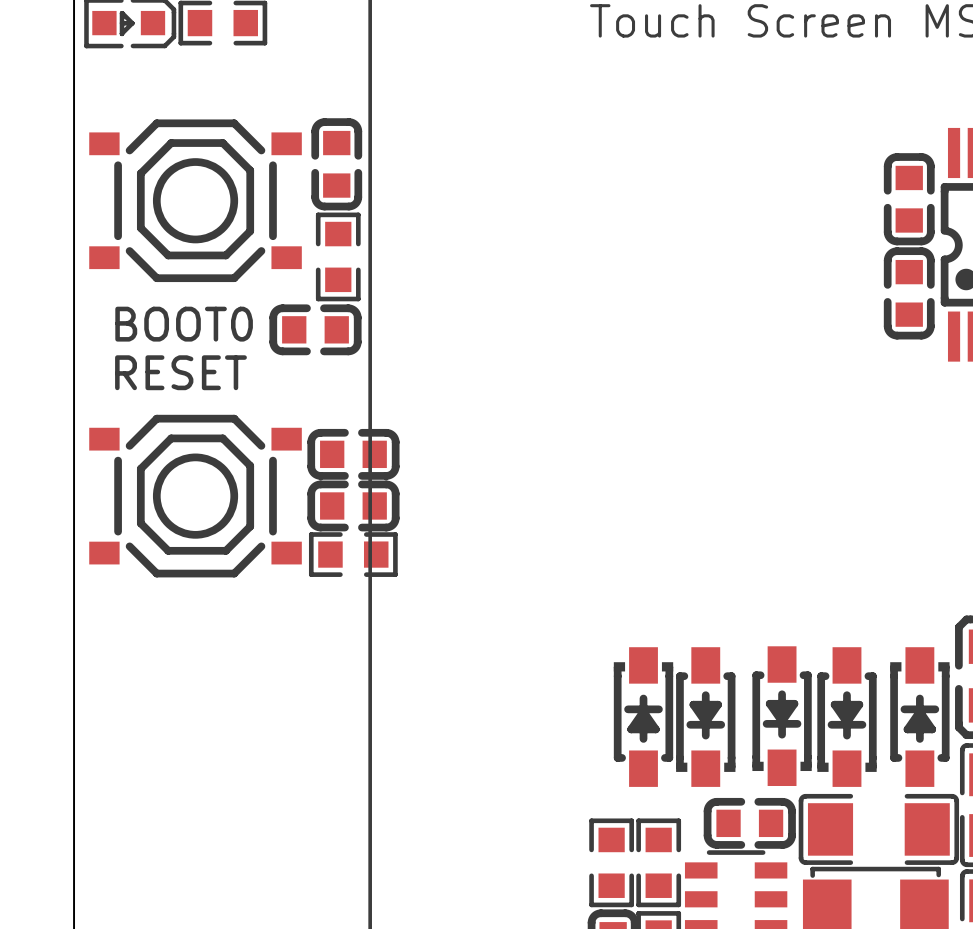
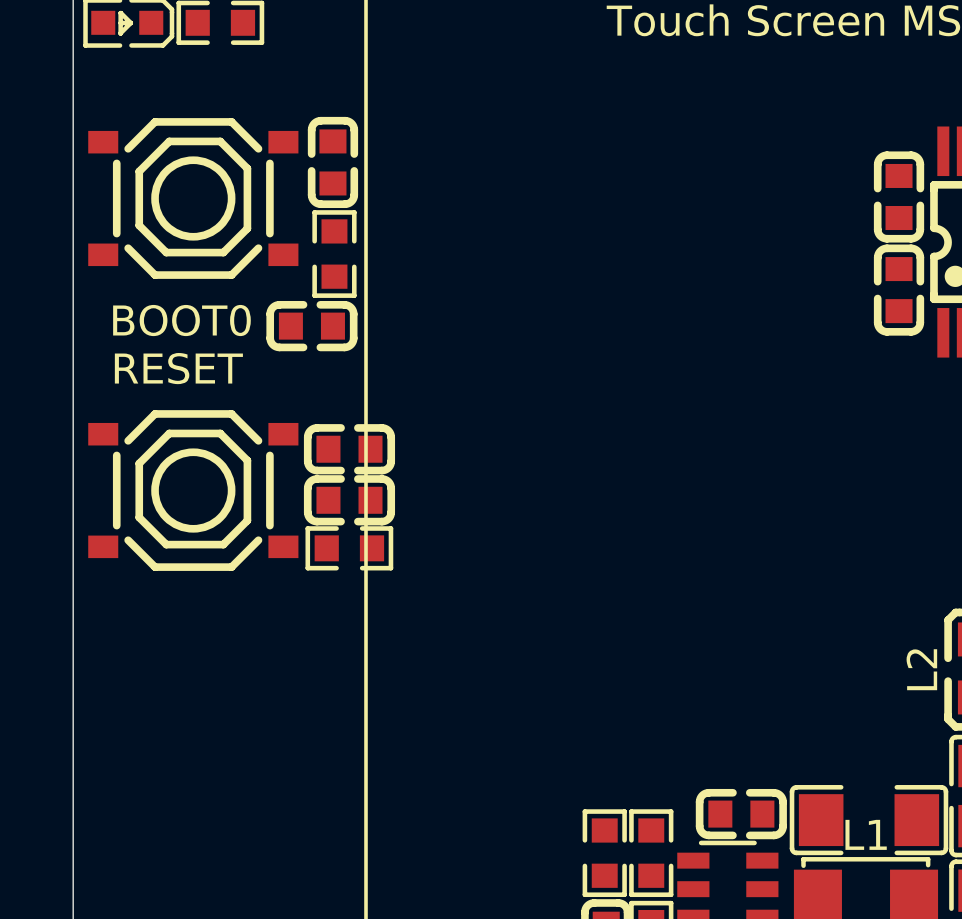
L2 name: none -> L2 (921, 669)
part: (782, 716) -> none
part: (643, 717) -> none
part: (705, 717) -> none
part: (846, 717) -> none
part: (919, 717) -> none
L1 name: none -> L1 (866, 834)

